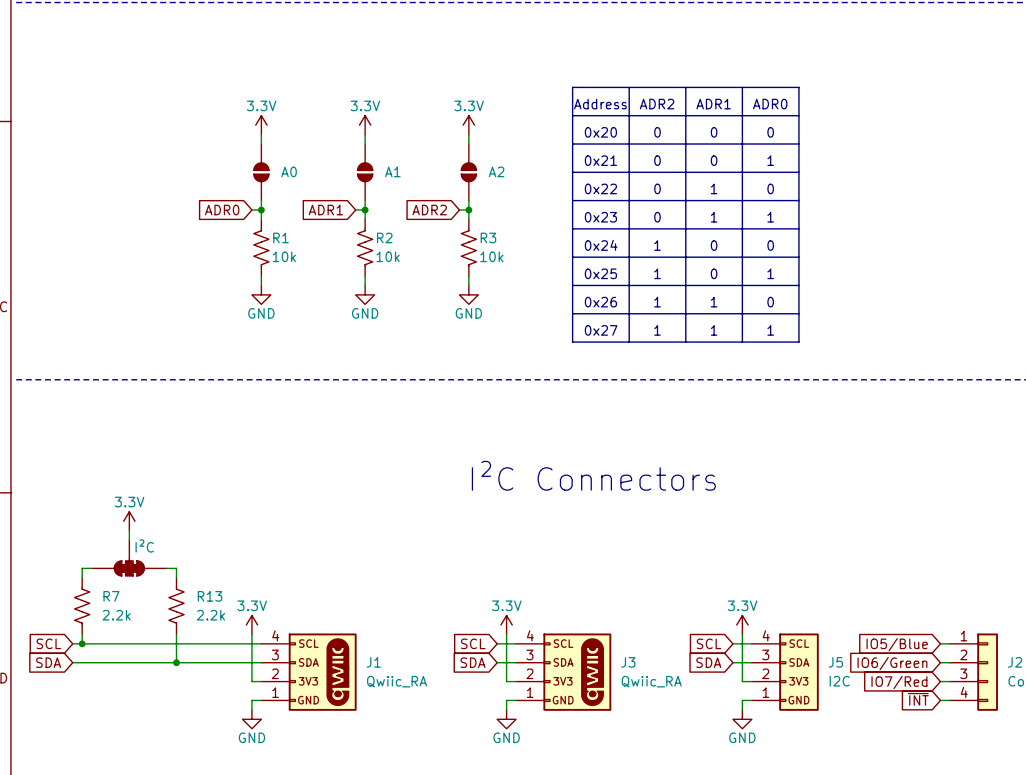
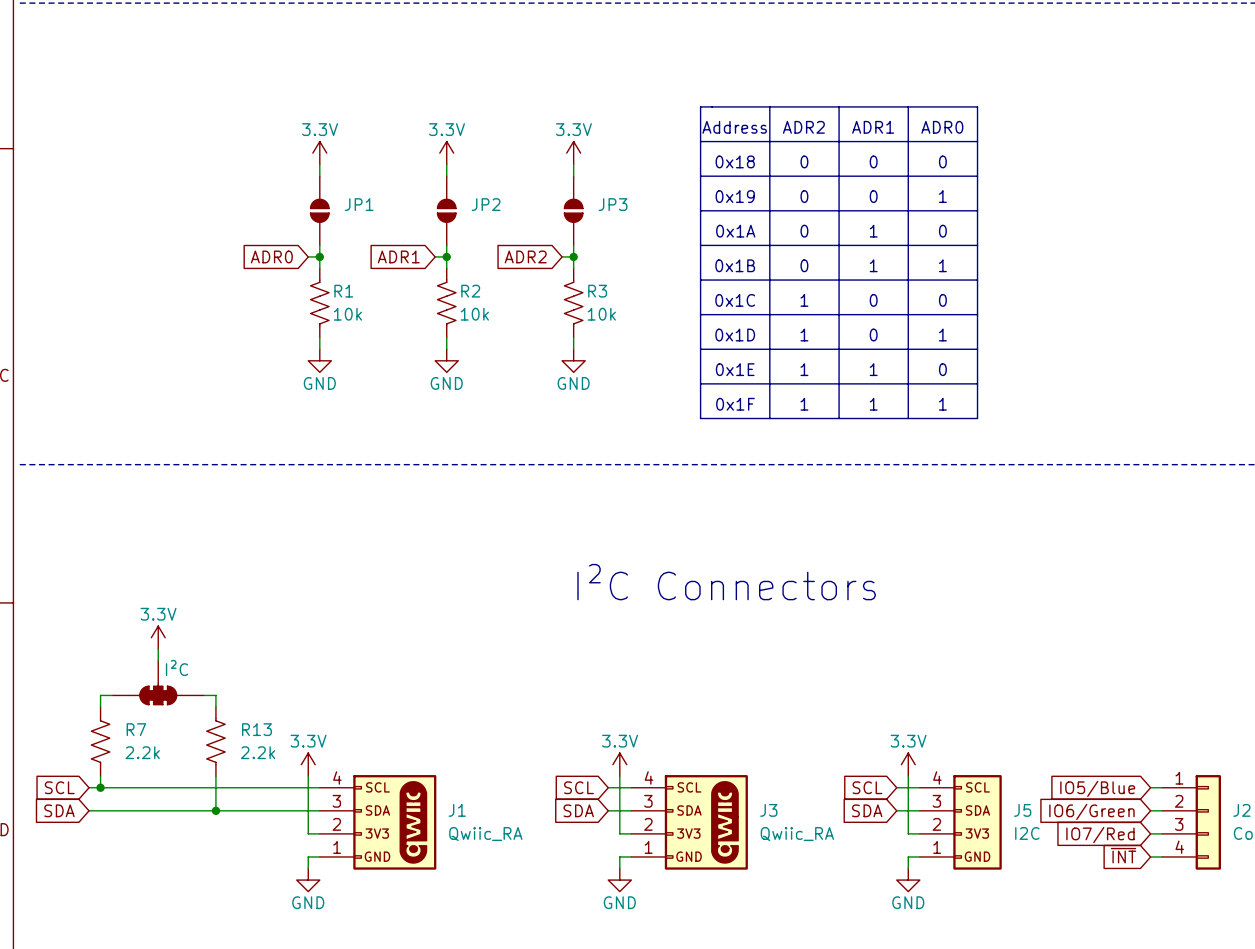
text: 0x20 (600, 132) -> 0x18 (735, 161)
text: 0x21 (600, 160) -> 0x19 (735, 196)
JP1 name: none -> JP1 (359, 204)
JP2 name: none -> JP2 (486, 204)
JP3 name: none -> JP3 (613, 204)
JP1 value: A0 (289, 171) -> none
JP2 value: A1 (392, 171) -> none
JP3 value: A2 (496, 171) -> none
text: 0x22 (600, 188) -> 0x1A (735, 231)
text: 0x23 (600, 217) -> 0x1B (735, 265)
text: 0x24 (601, 245) -> 0x1C (735, 300)
text: 0x25 (600, 273) -> 0x1D (735, 335)
text: 0x26 (600, 302) -> 0x1E (735, 369)
text: 0x27 (601, 330) -> 0x1F (735, 404)

